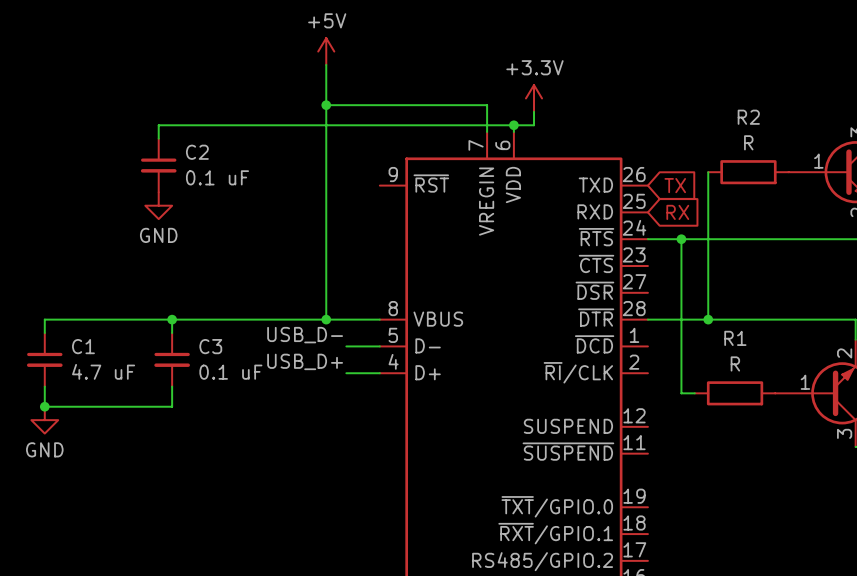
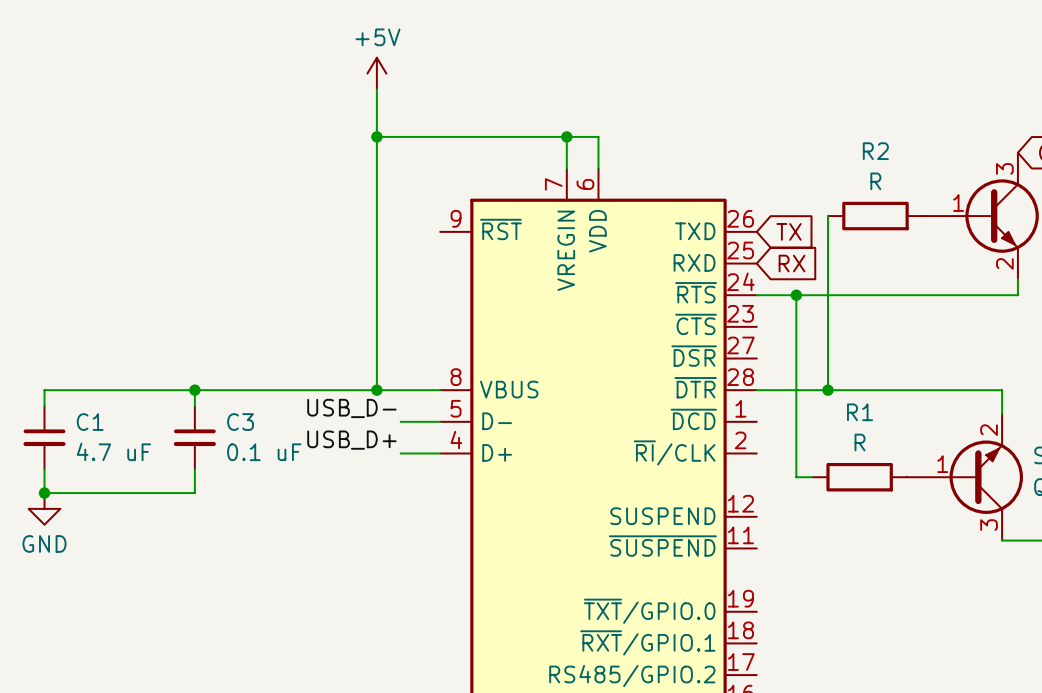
power symbol: +3.3V (534, 98) -> none
wire: none -> (566, 136) (598, 136) (598, 160)
wire: (534, 111) (534, 125) (158, 125) (158, 138) -> none
junction position: (513, 125) -> (566, 136)
C2: 0.1 uF (158, 165) -> none
power symbol: GND (158, 205) -> none

